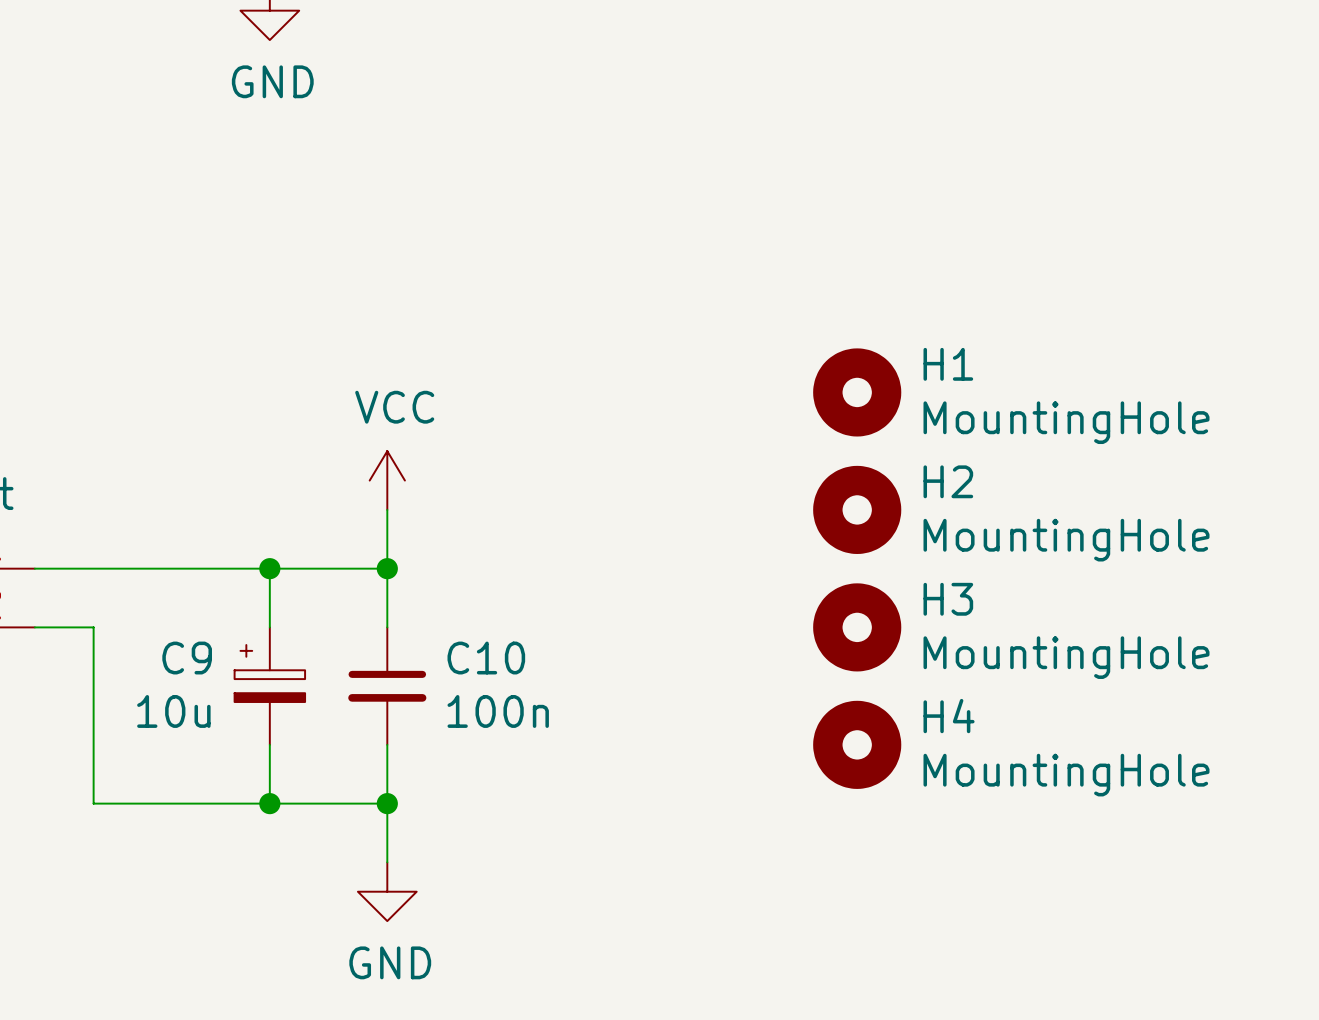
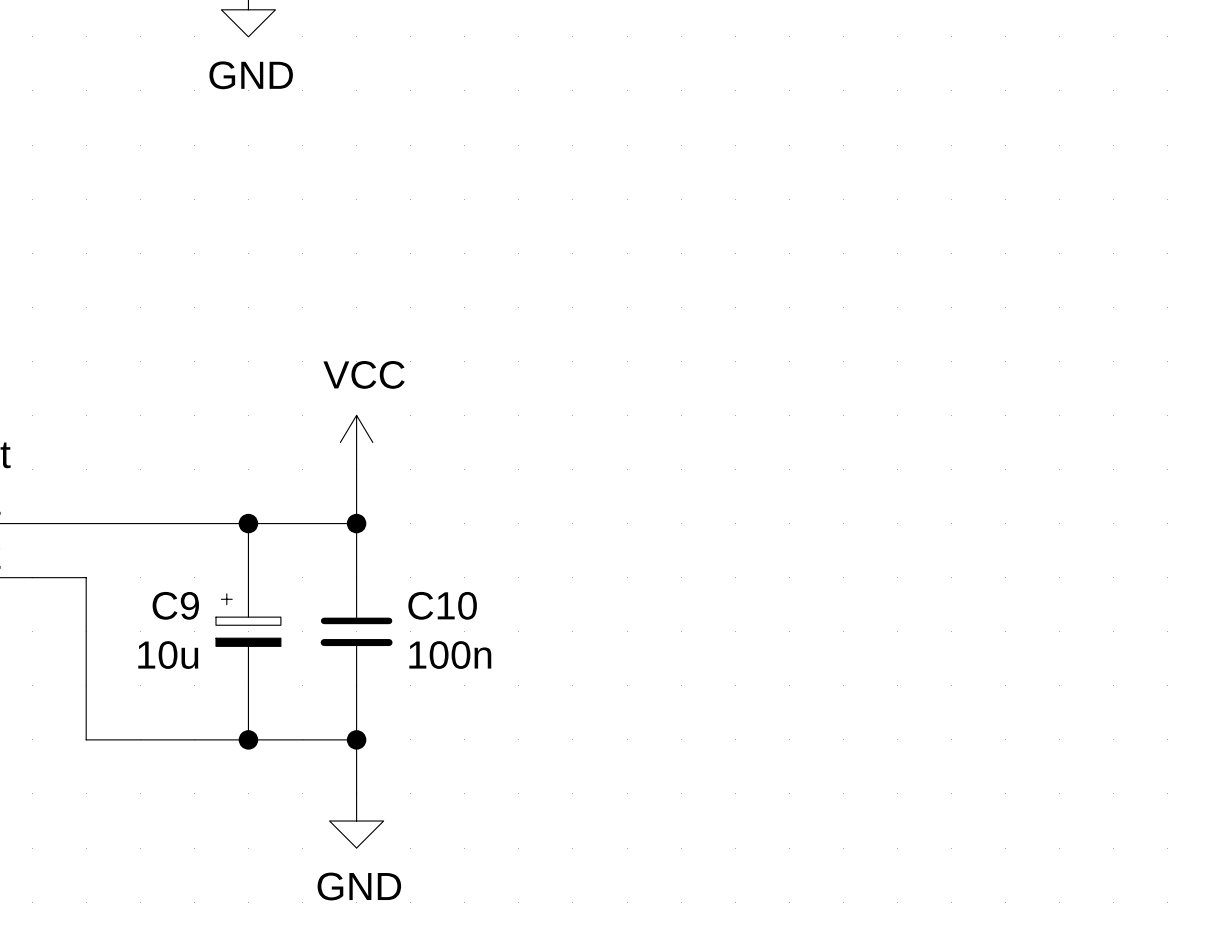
H1: MountingHole (857, 392) -> none
H2: MountingHole (857, 509) -> none
H3: MountingHole (857, 627) -> none
H4: MountingHole (857, 744) -> none

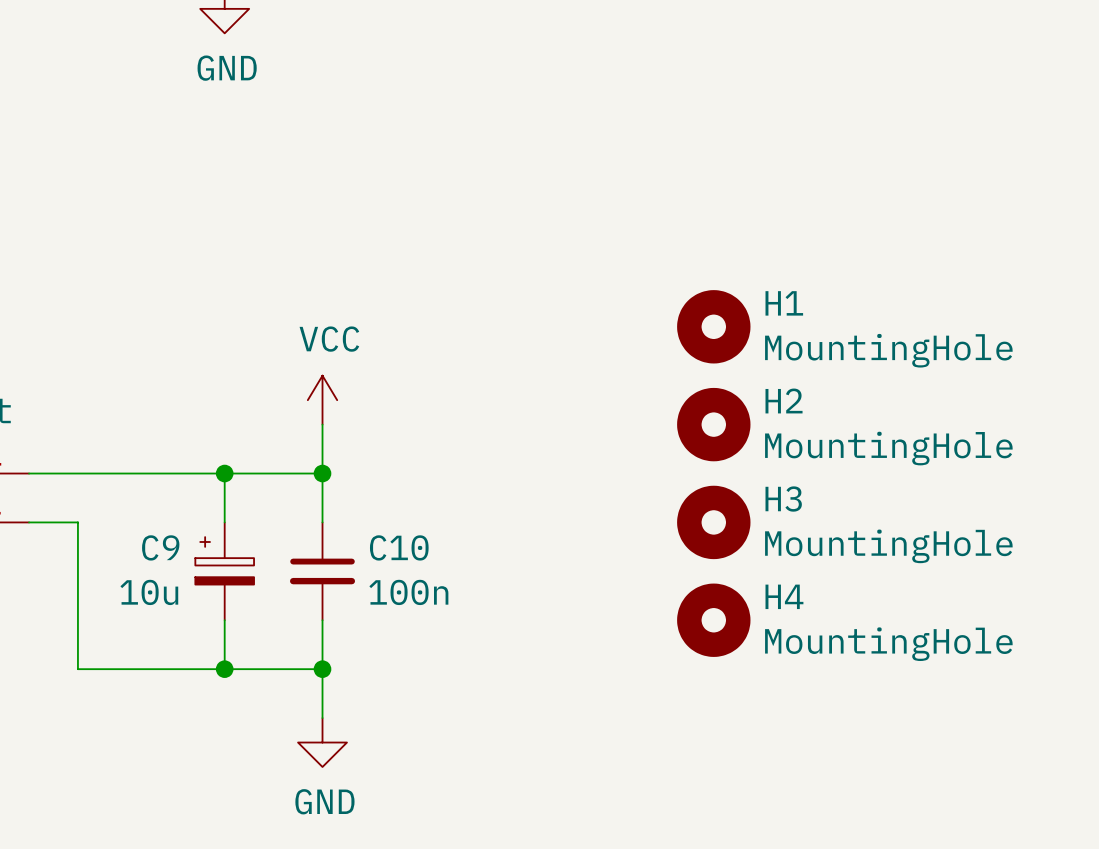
H1: none -> MountingHole (713, 326)
H2: none -> MountingHole (713, 424)
H3: none -> MountingHole (713, 522)
H4: none -> MountingHole (713, 620)

